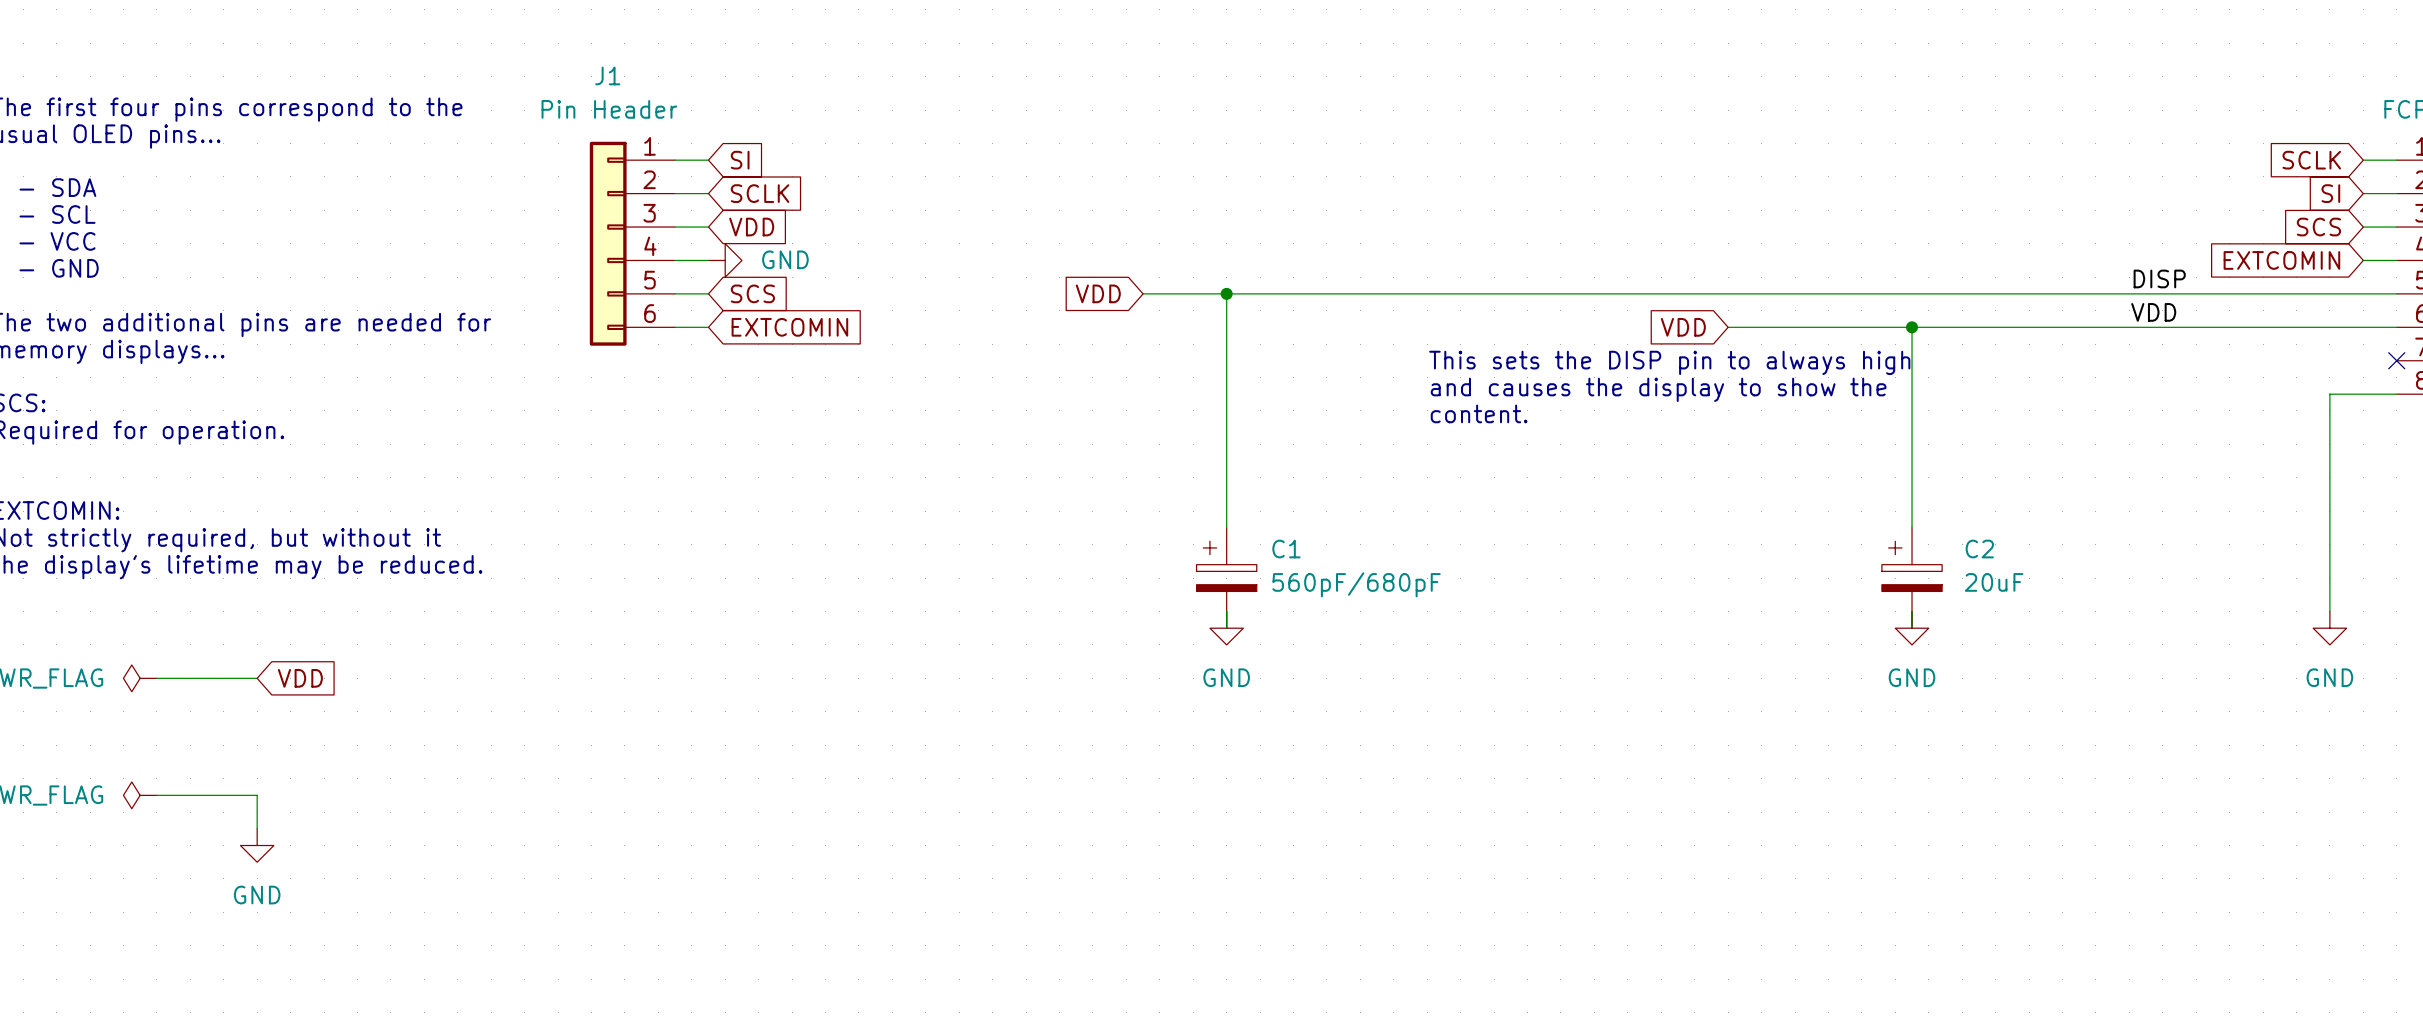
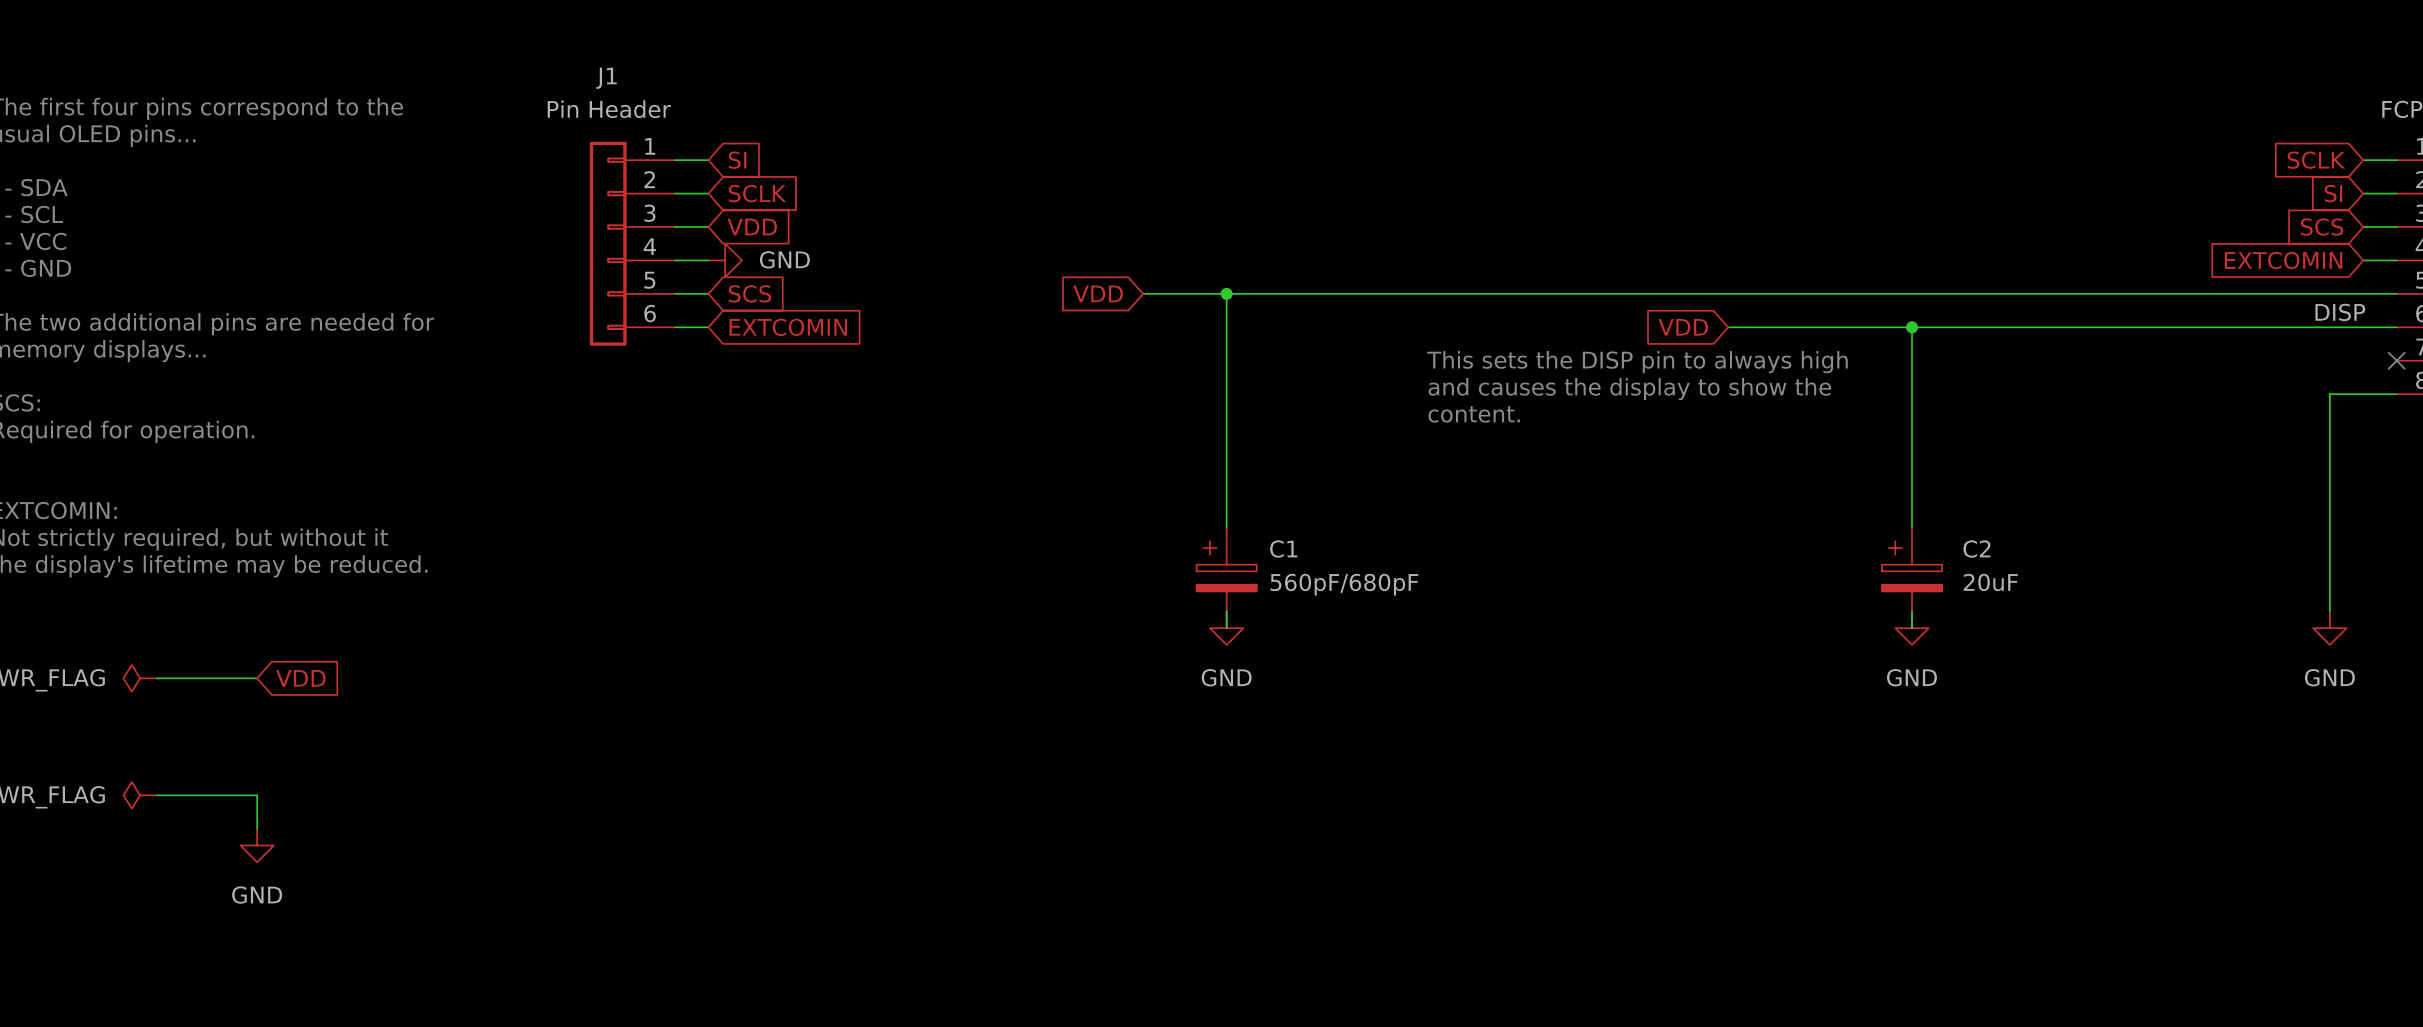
label position: DISP (2159, 278) -> DISP (2340, 312)
label: VDD (2153, 312) -> none

